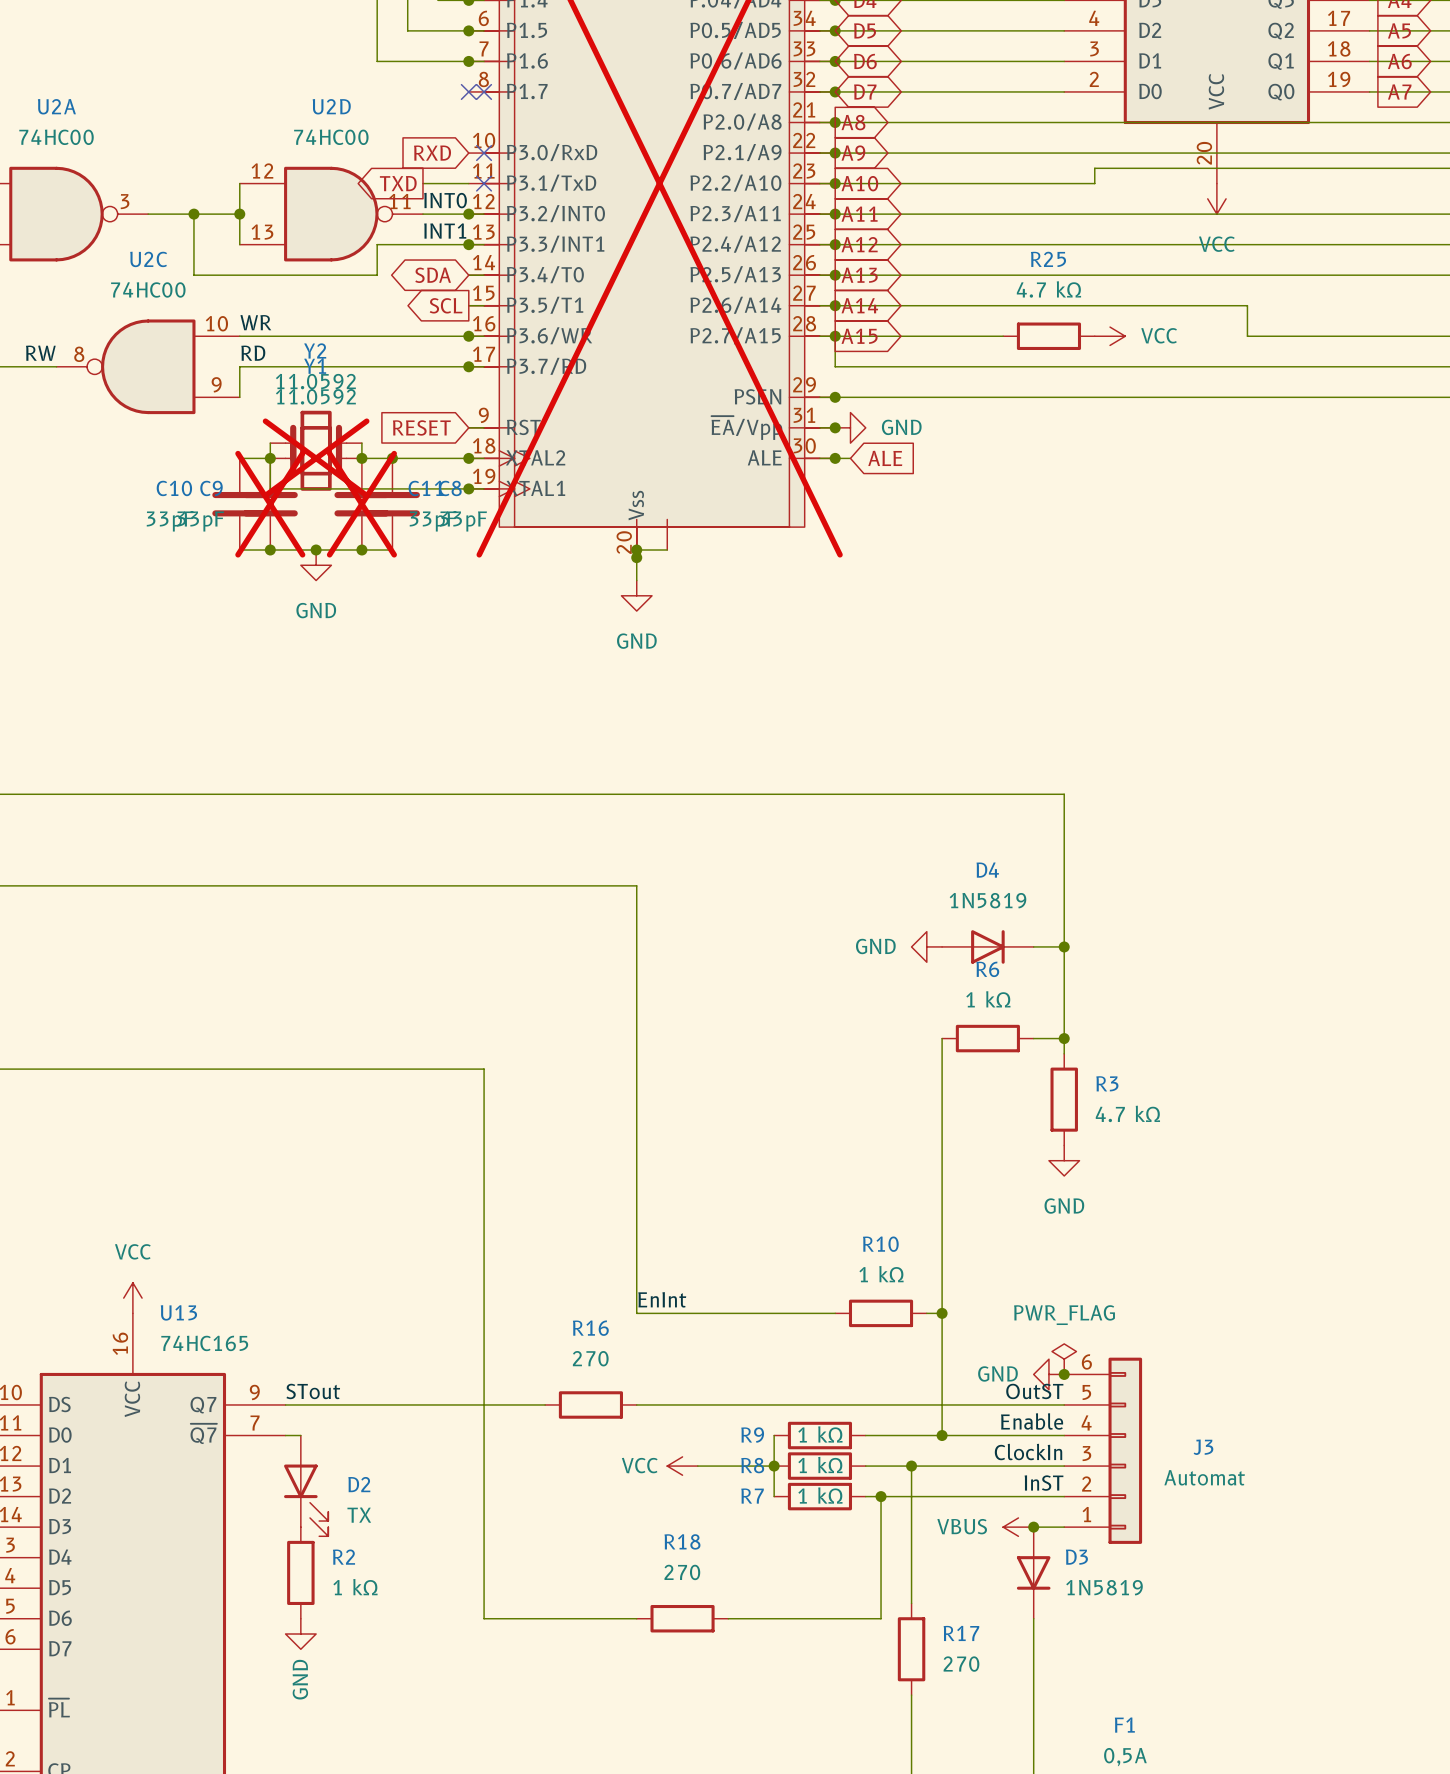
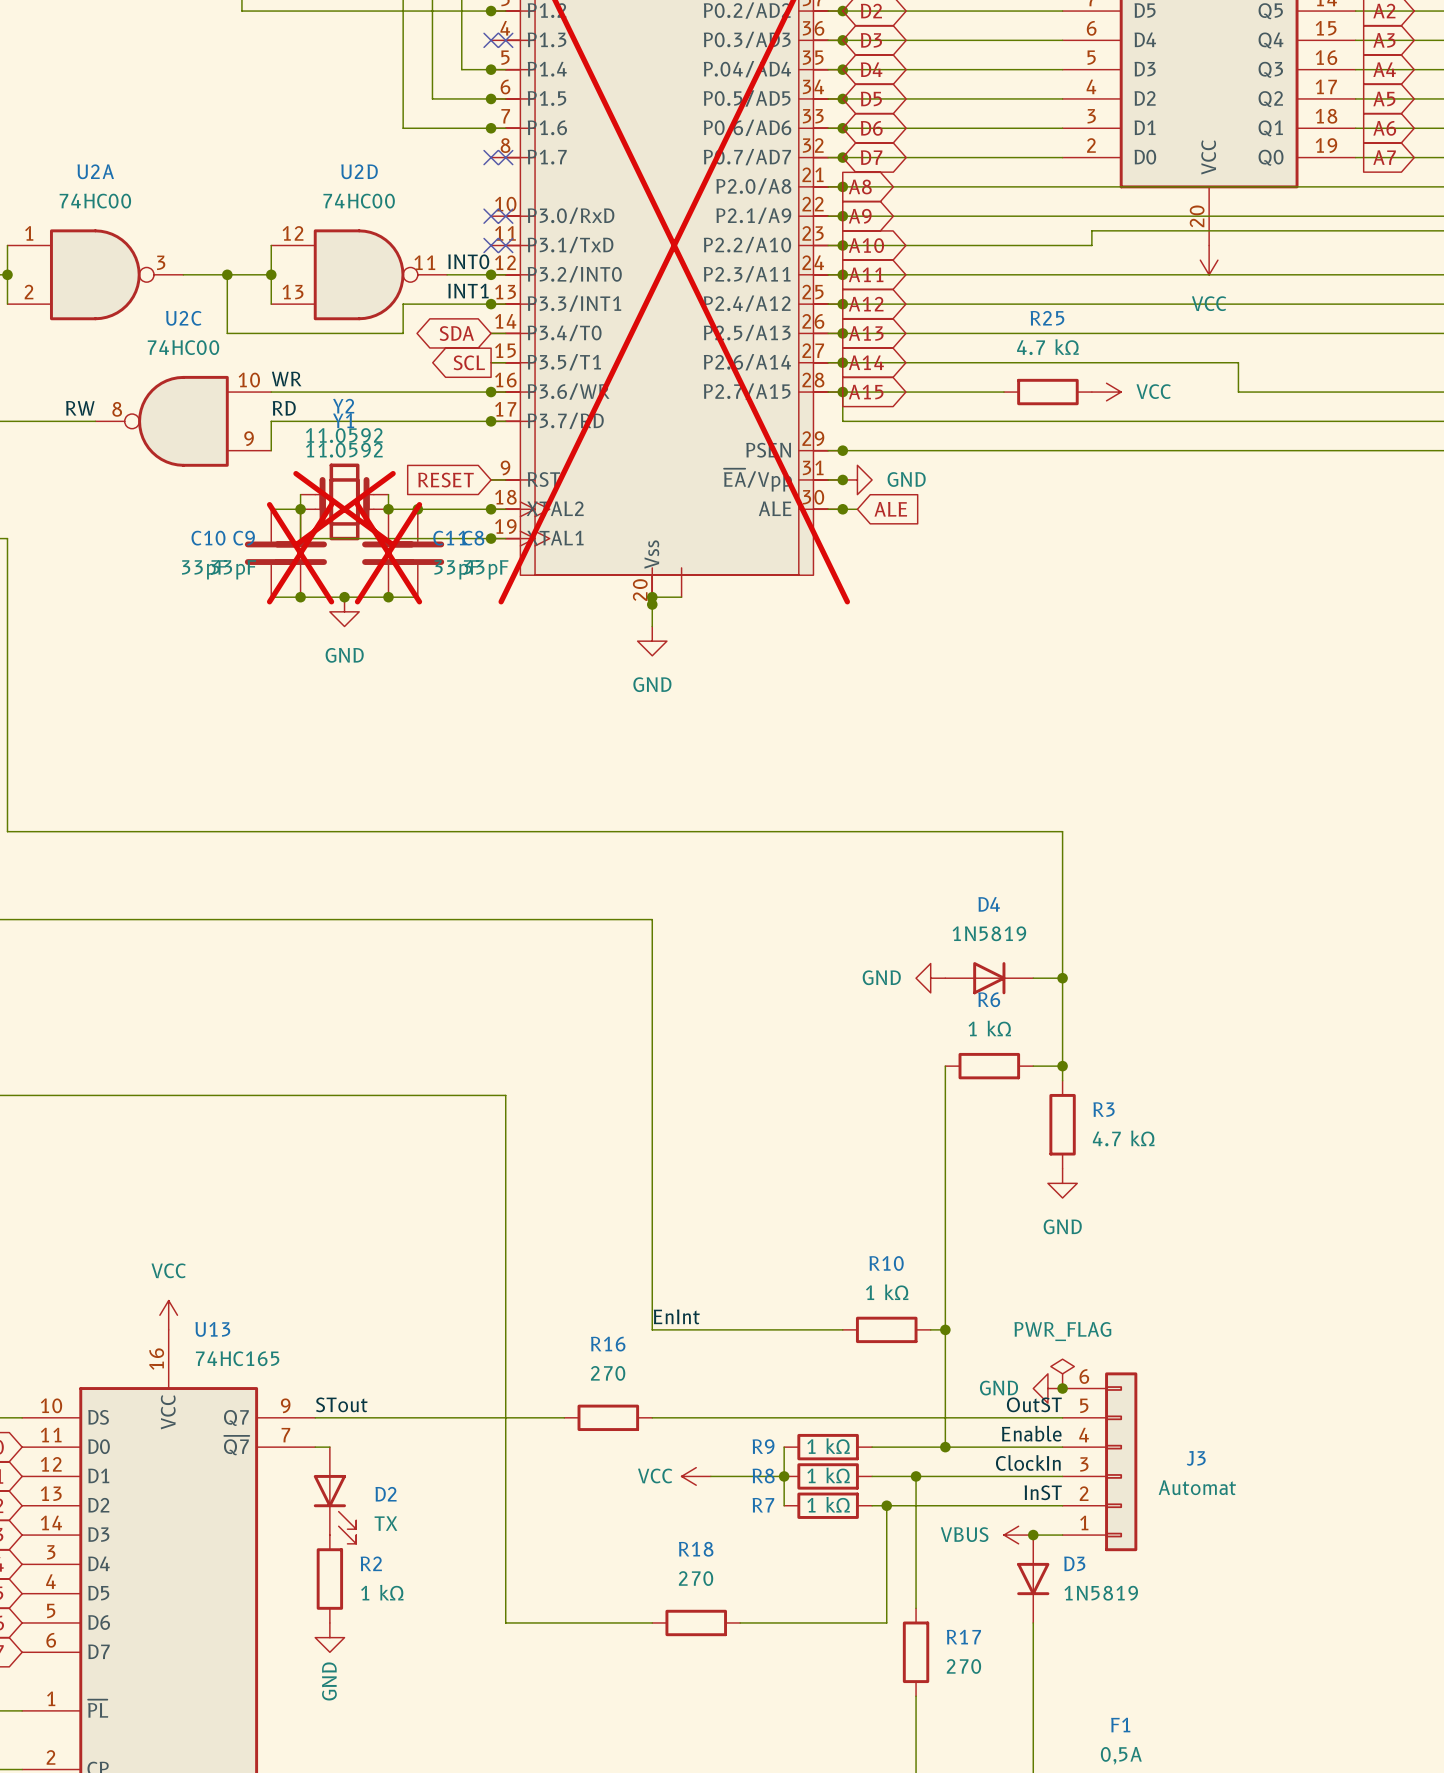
global label: RXD (432, 153) -> none
no-connect mark: none -> (491, 216)
global label: TXD (398, 183) -> none
wire: (422, 183) (468, 183) -> none
no-connect mark: none -> (491, 245)

